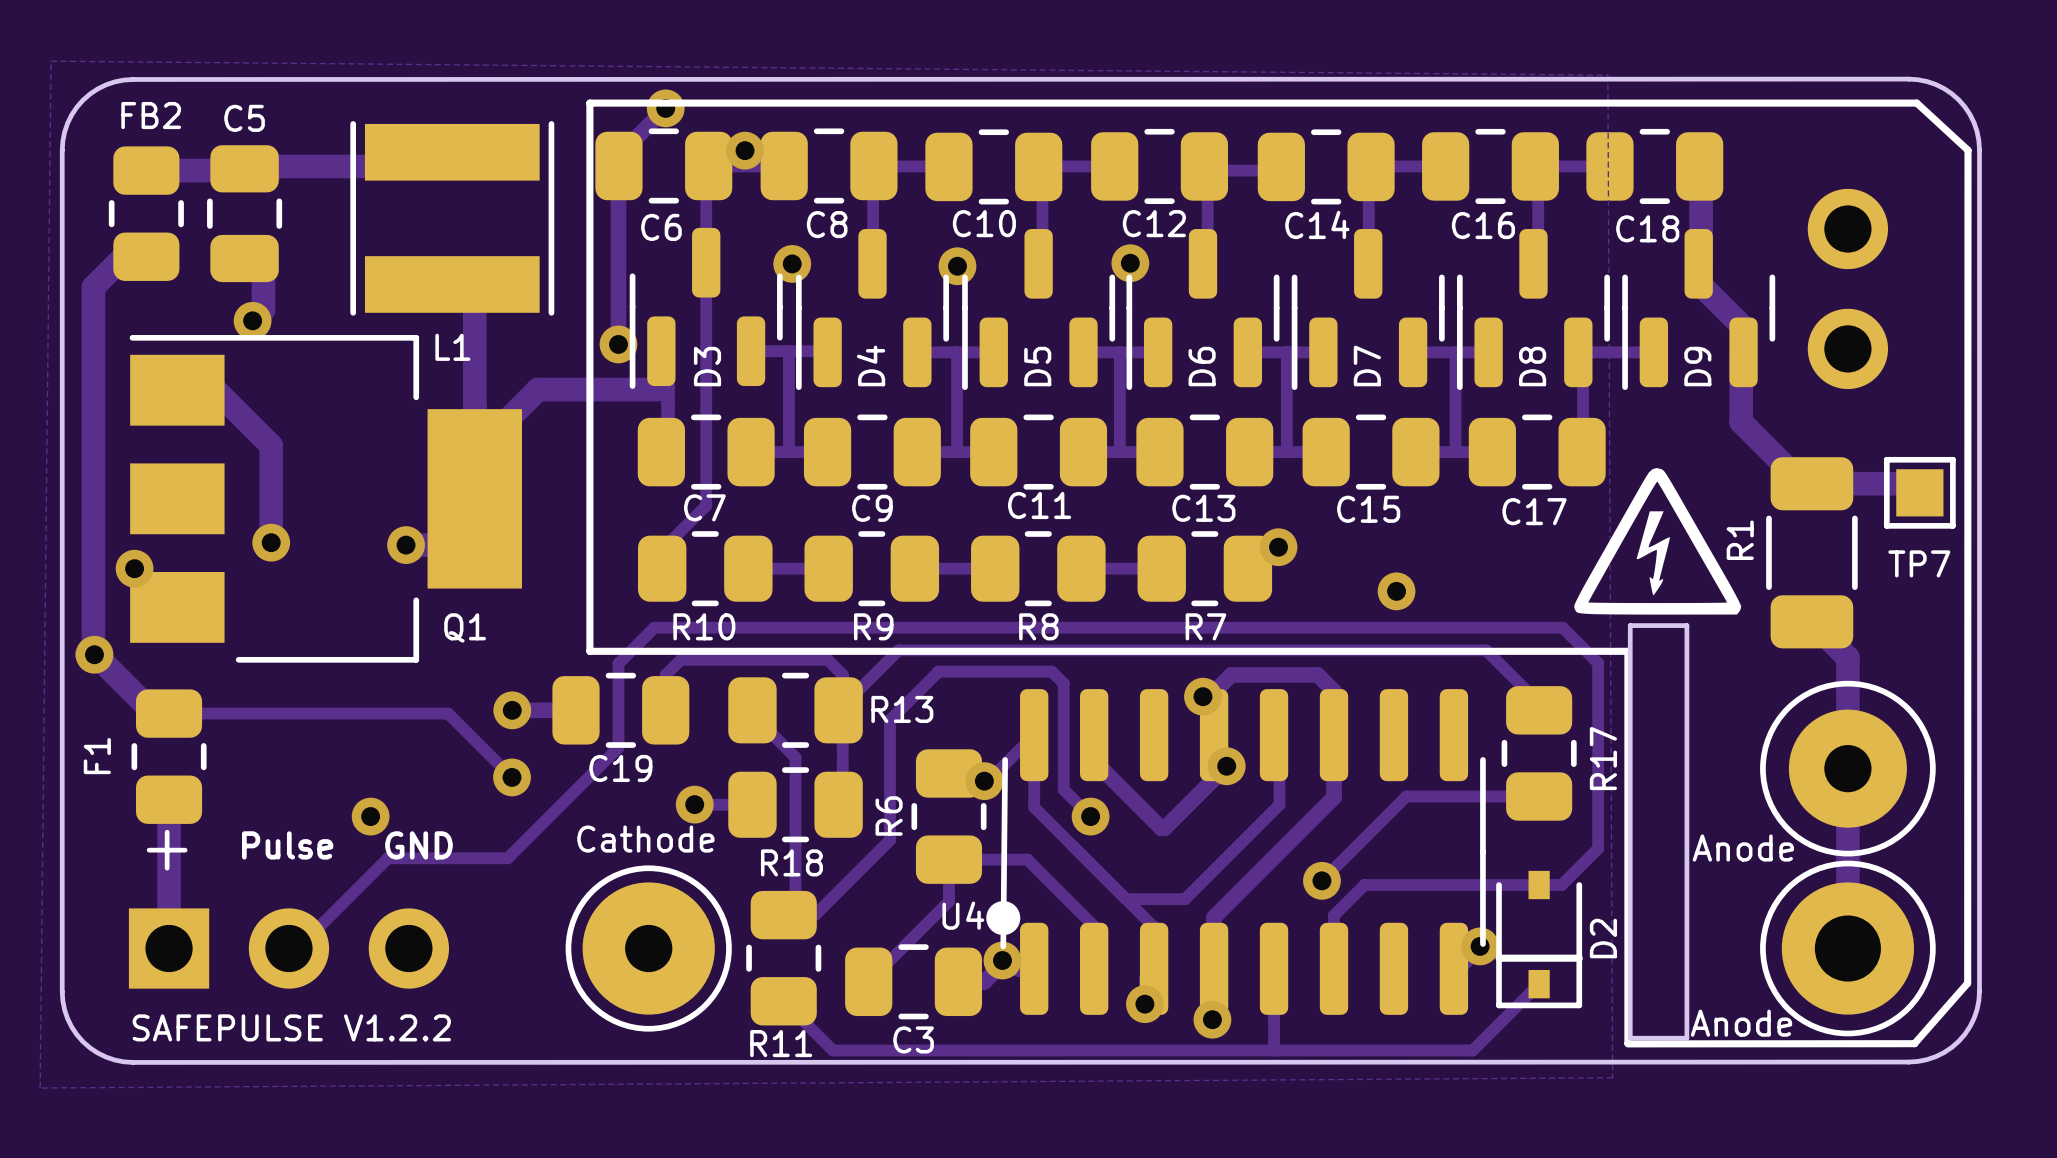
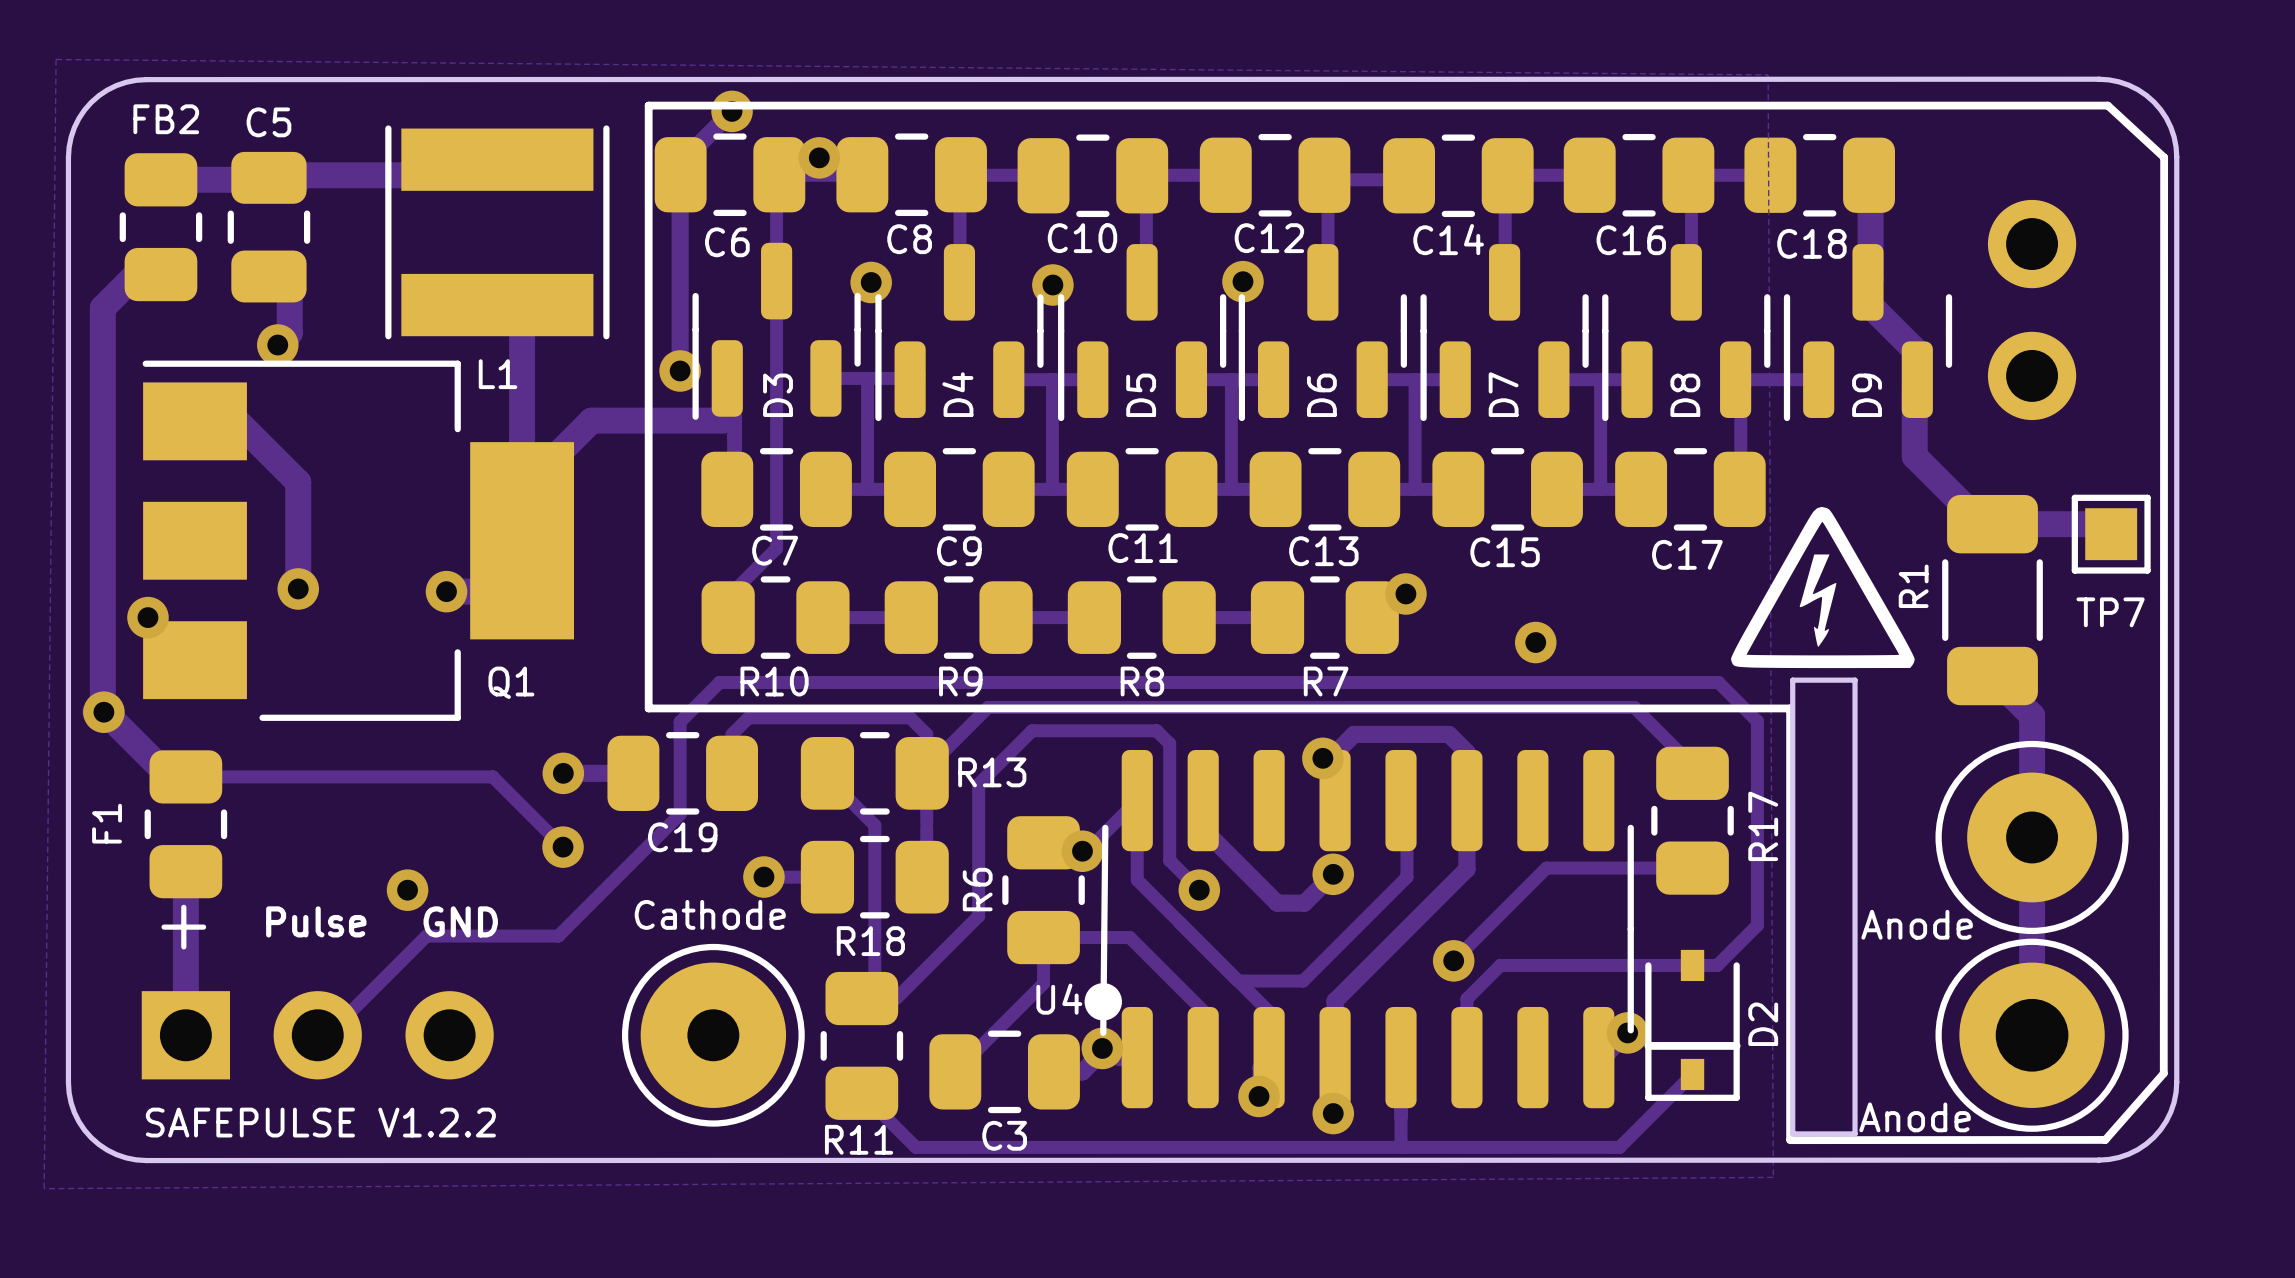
track: (1226, 766) (1164, 828) -> (1333, 874) (1304, 903) (1280, 903)
via position: (1226, 766) -> (1333, 874)

